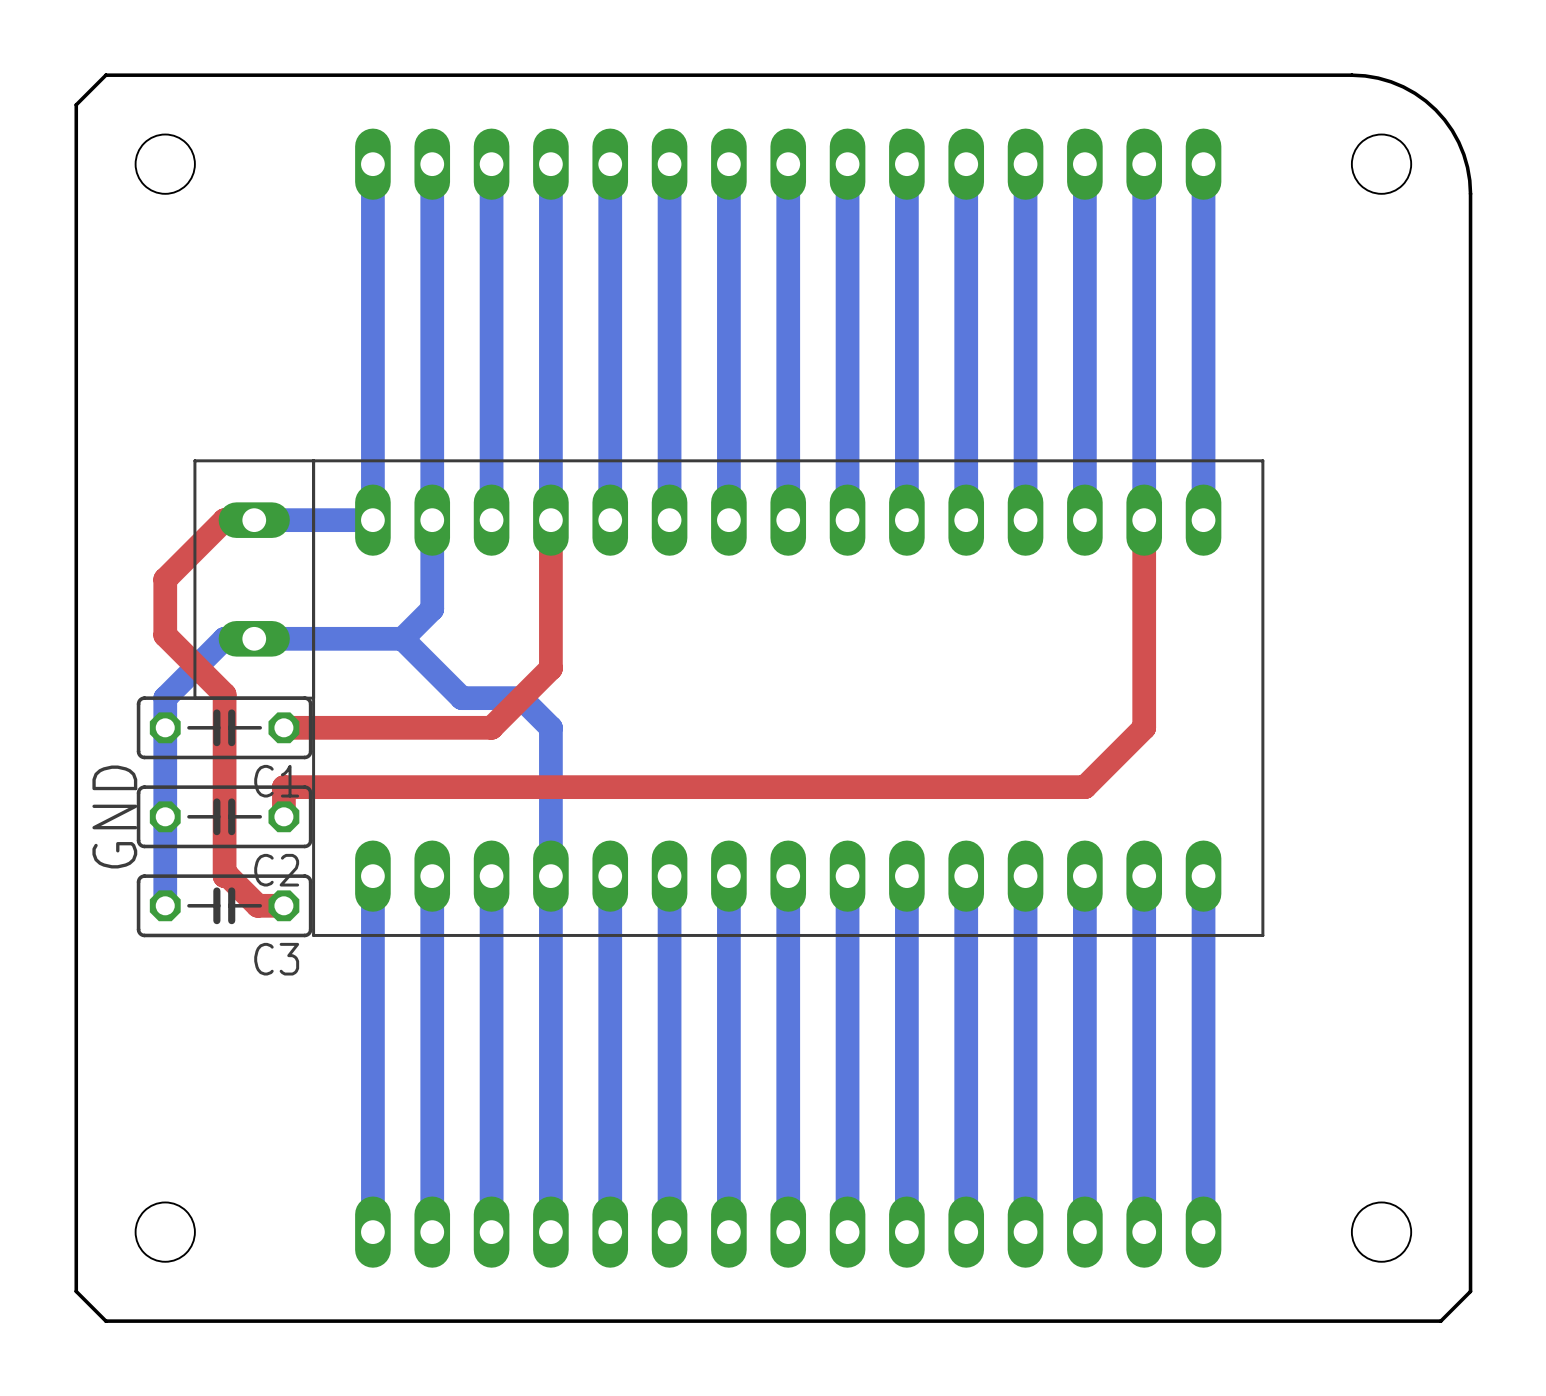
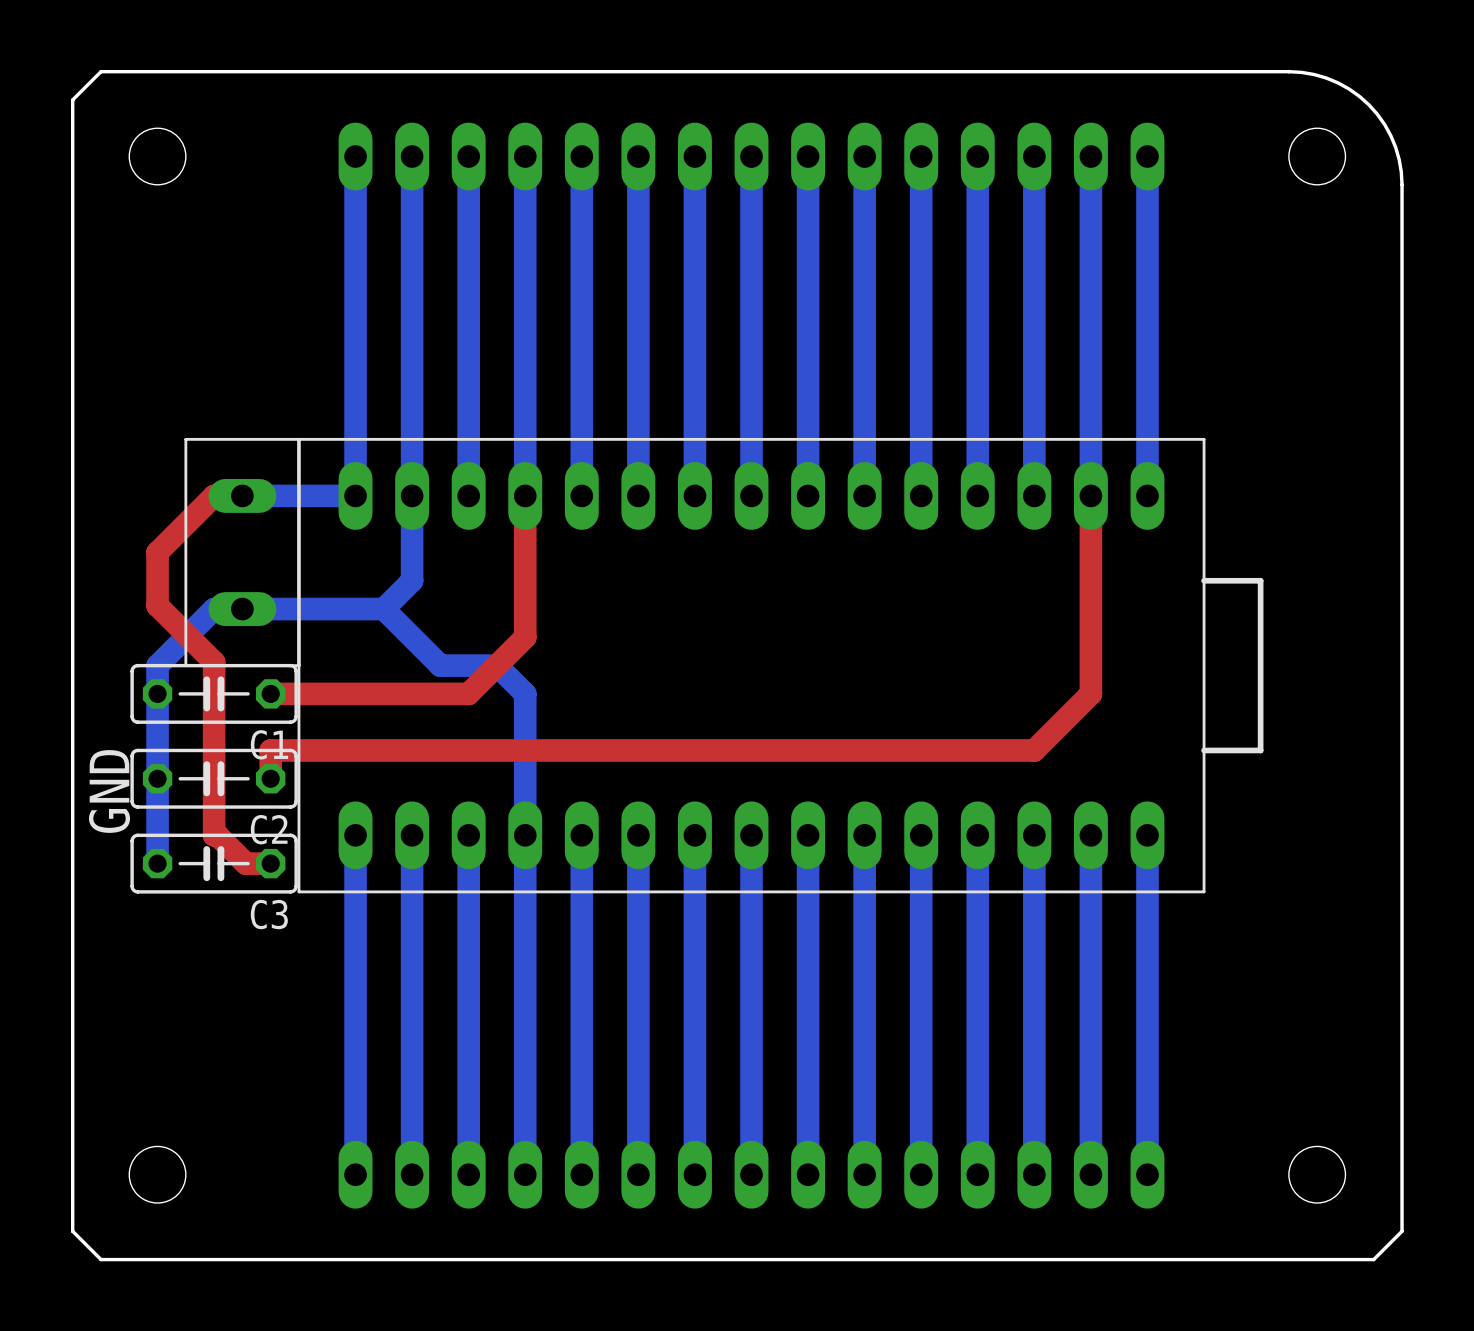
line: none -> (1204, 580) (1260, 580) (1260, 750) (1204, 750)

